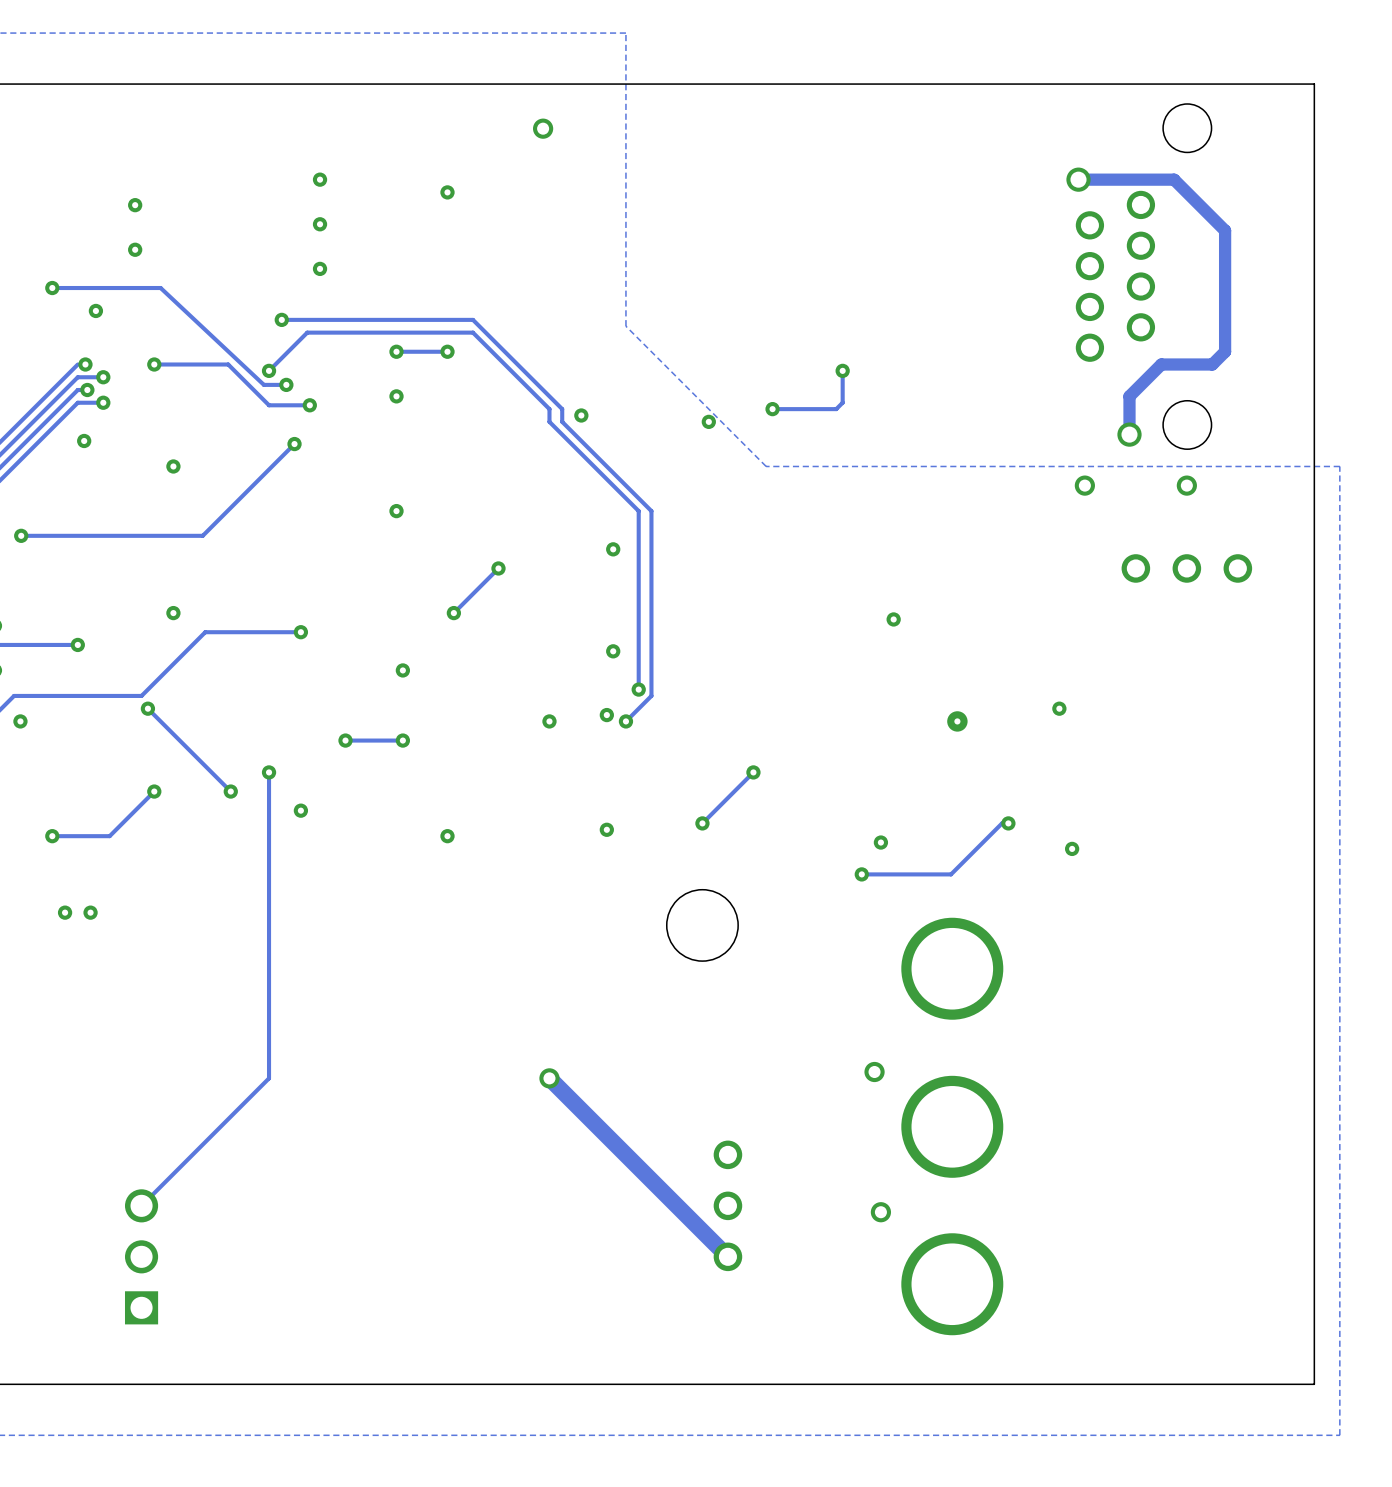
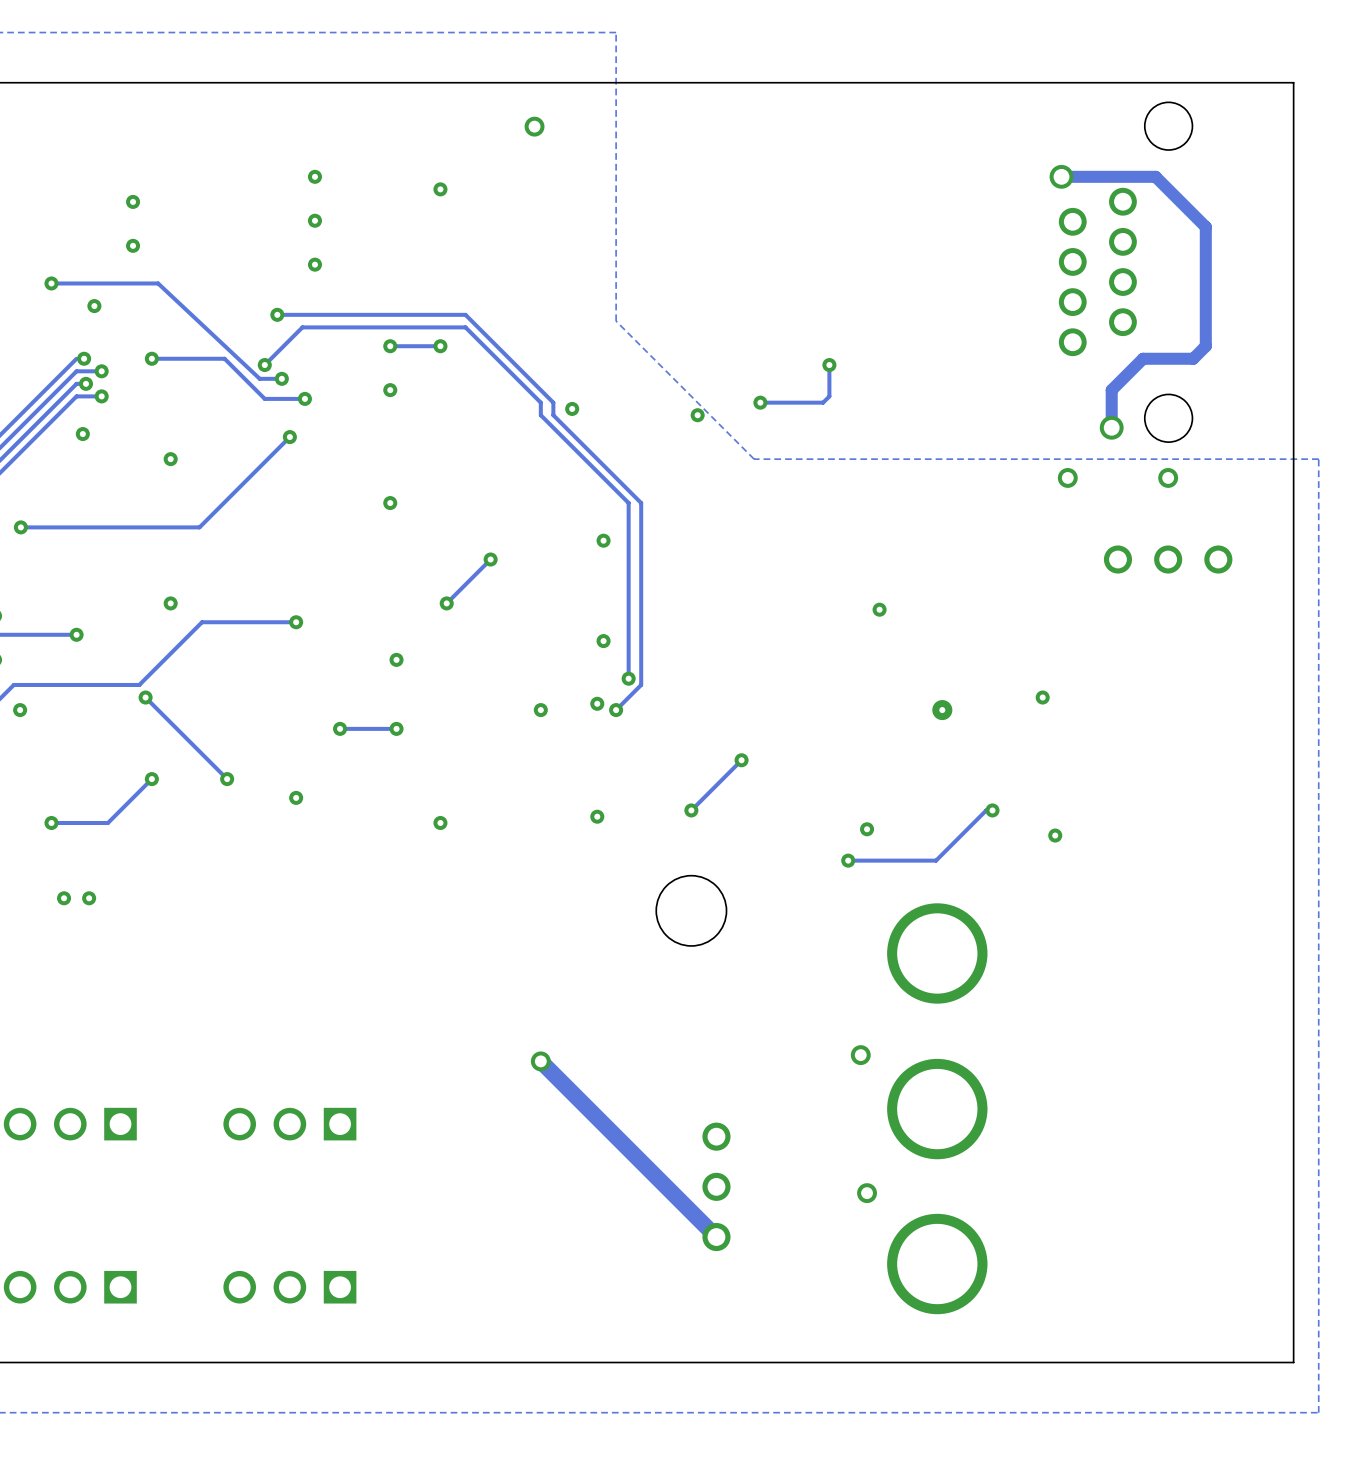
track: (269, 772) (269, 1078) (141, 1205) -> none
via: (269, 772) -> none
part: none -> (70, 1124)
part: none -> (289, 1124)
part: (141, 1256) -> none
part: none -> (70, 1287)
part: none -> (289, 1287)

